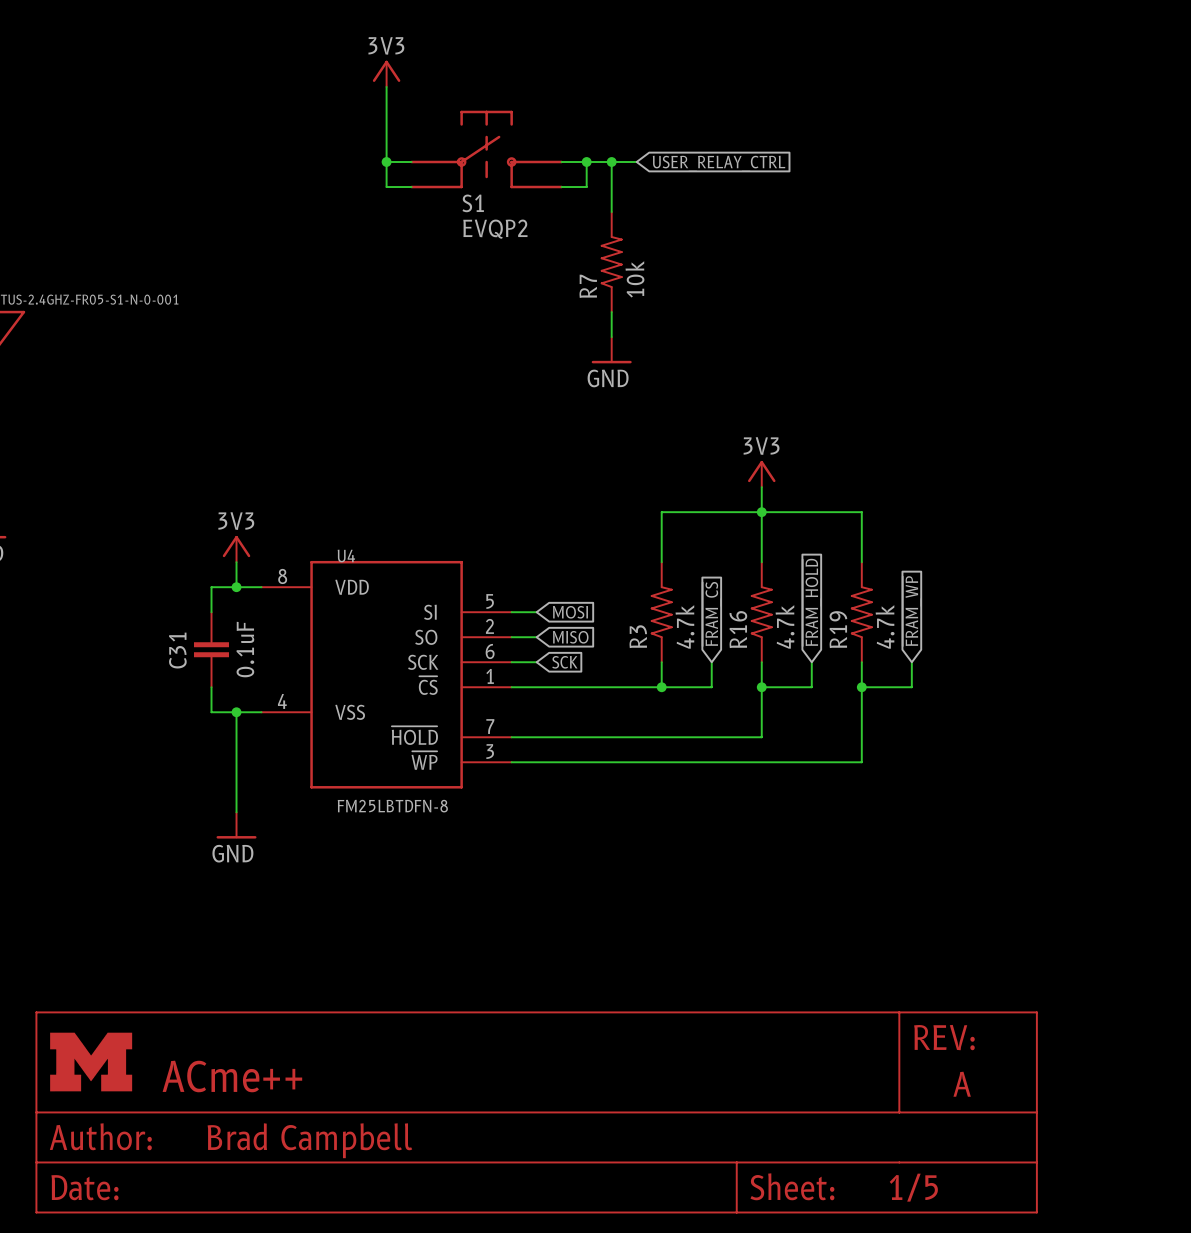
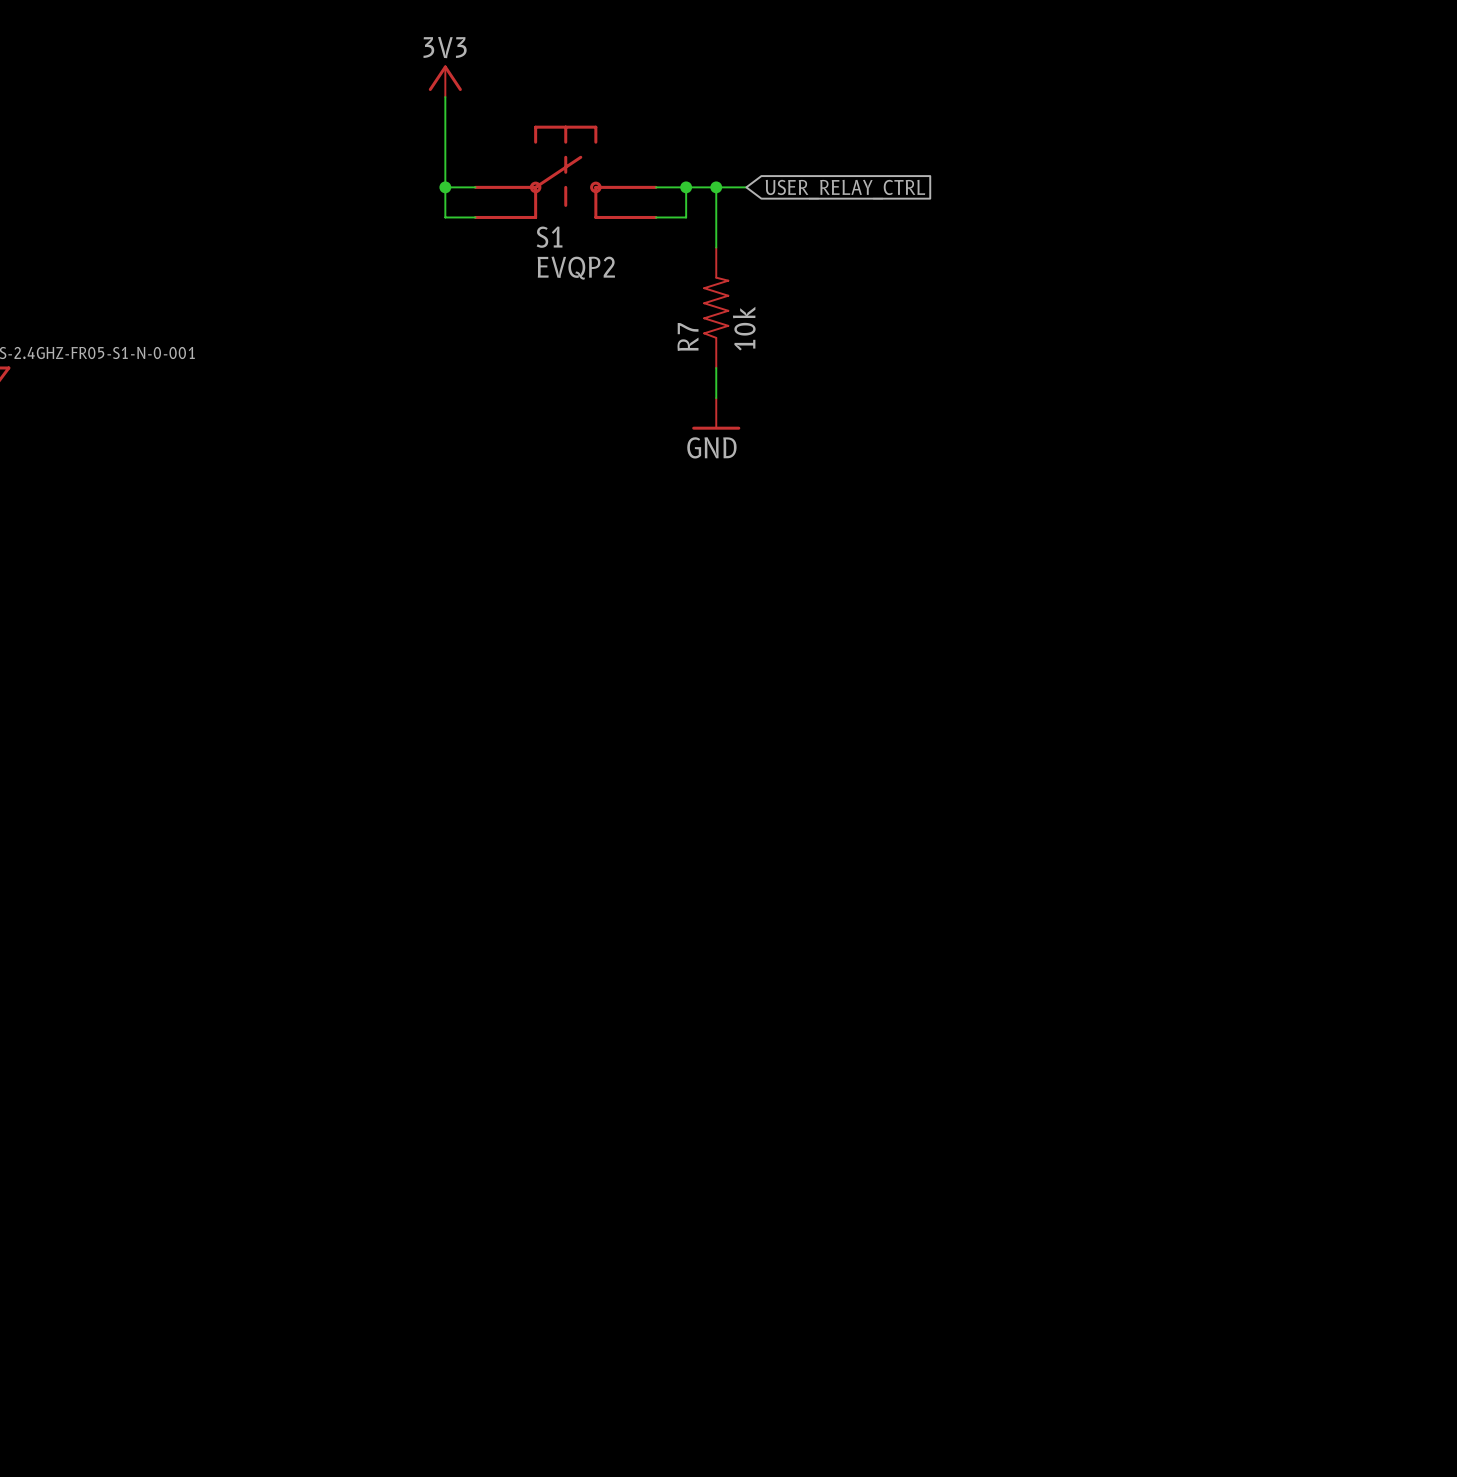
power symbol: 3V3 (761, 474) -> none
wire: (761, 487) (761, 562) -> none
junction: (761, 512) -> none
power symbol: 3V3 (236, 549) -> none
wire: (236, 562) (236, 587) -> none
wire: (661, 562) (661, 512) (861, 512) (861, 562) -> none
junction: (236, 587) -> none
wire: (261, 587) (211, 587) (211, 612) -> none
global label: ~{FRAM_HOLD} (812, 602) -> none
global label: ~{FRAM_WP} (912, 611) -> none
wire: (511, 612) (536, 612) -> none
global label: MOSI (570, 612) -> none
R3: 4.7k (661, 612) -> none
R16: 4.7k (761, 612) -> none
R19: 4.7k (861, 612) -> none
global label: ~{FRAM_CS} (712, 614) -> none
wire: (511, 637) (536, 637) -> none
global label: MISO (570, 637) -> none
C31: 0.1uF (211, 649) -> none
wire: (511, 662) (536, 662) -> none
global label: SCK (564, 662) -> none
wire: (661, 662) (661, 687) -> none
wire: (711, 662) (711, 687) (511, 687) -> none
wire: (761, 662) (761, 737) (511, 737) -> none
wire: (811, 662) (811, 687) (761, 687) -> none
wire: (861, 662) (861, 762) (511, 762) -> none
wire: (911, 662) (911, 687) (861, 687) -> none
U4: FM25LBTDFN-8 (386, 674) -> none
wire: (211, 687) (211, 712) (261, 712) -> none
junction: (661, 687) -> none
junction: (761, 687) -> none
junction: (861, 687) -> none
wire: (236, 712) (236, 812) -> none
junction: (236, 712) -> none
power symbol: GND (236, 825) -> none
part: (536, 1112) -> none

